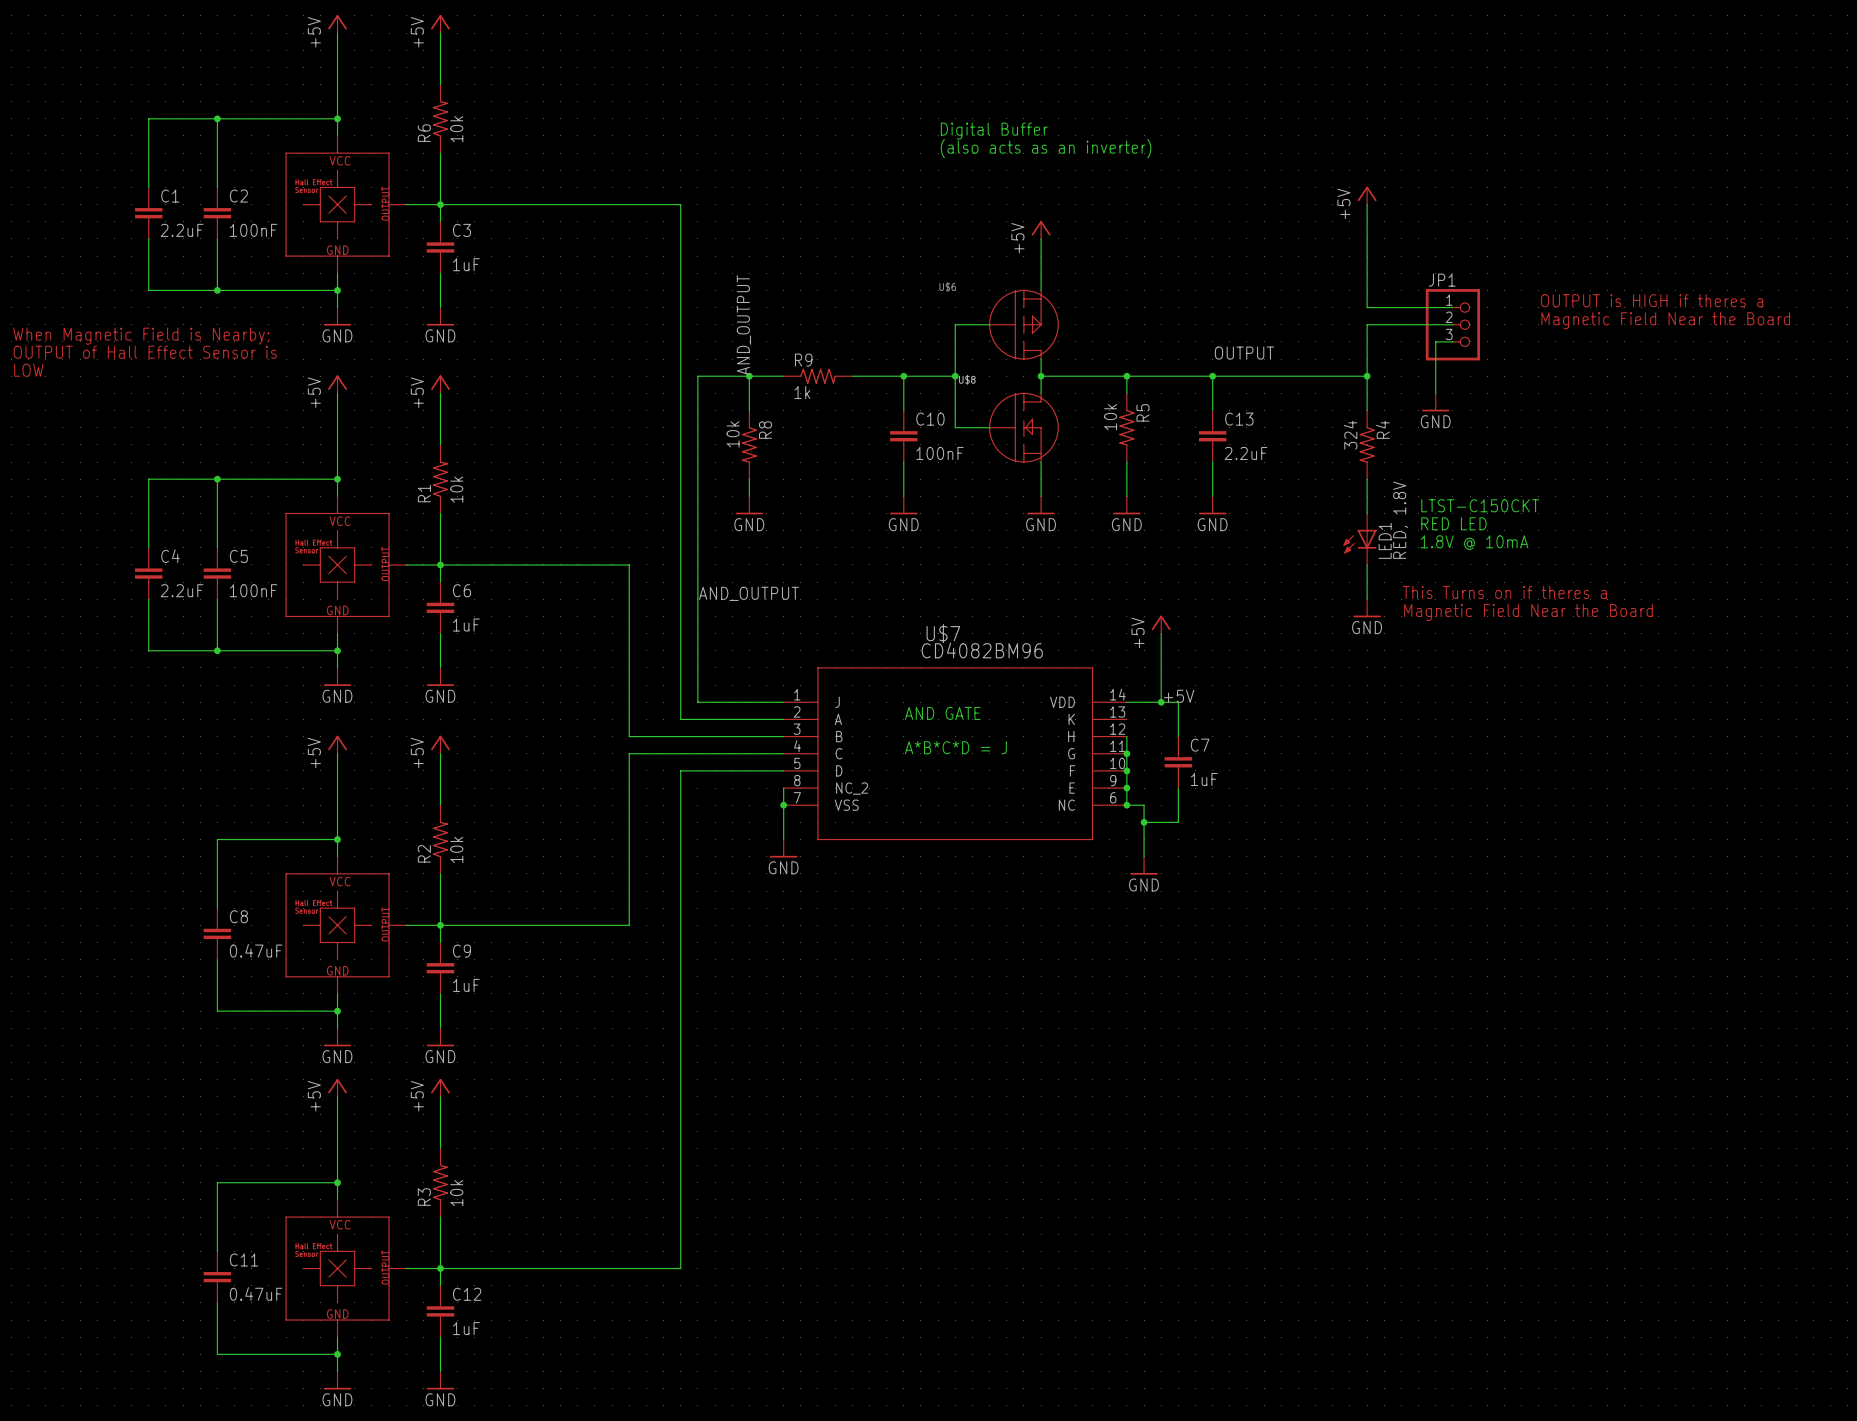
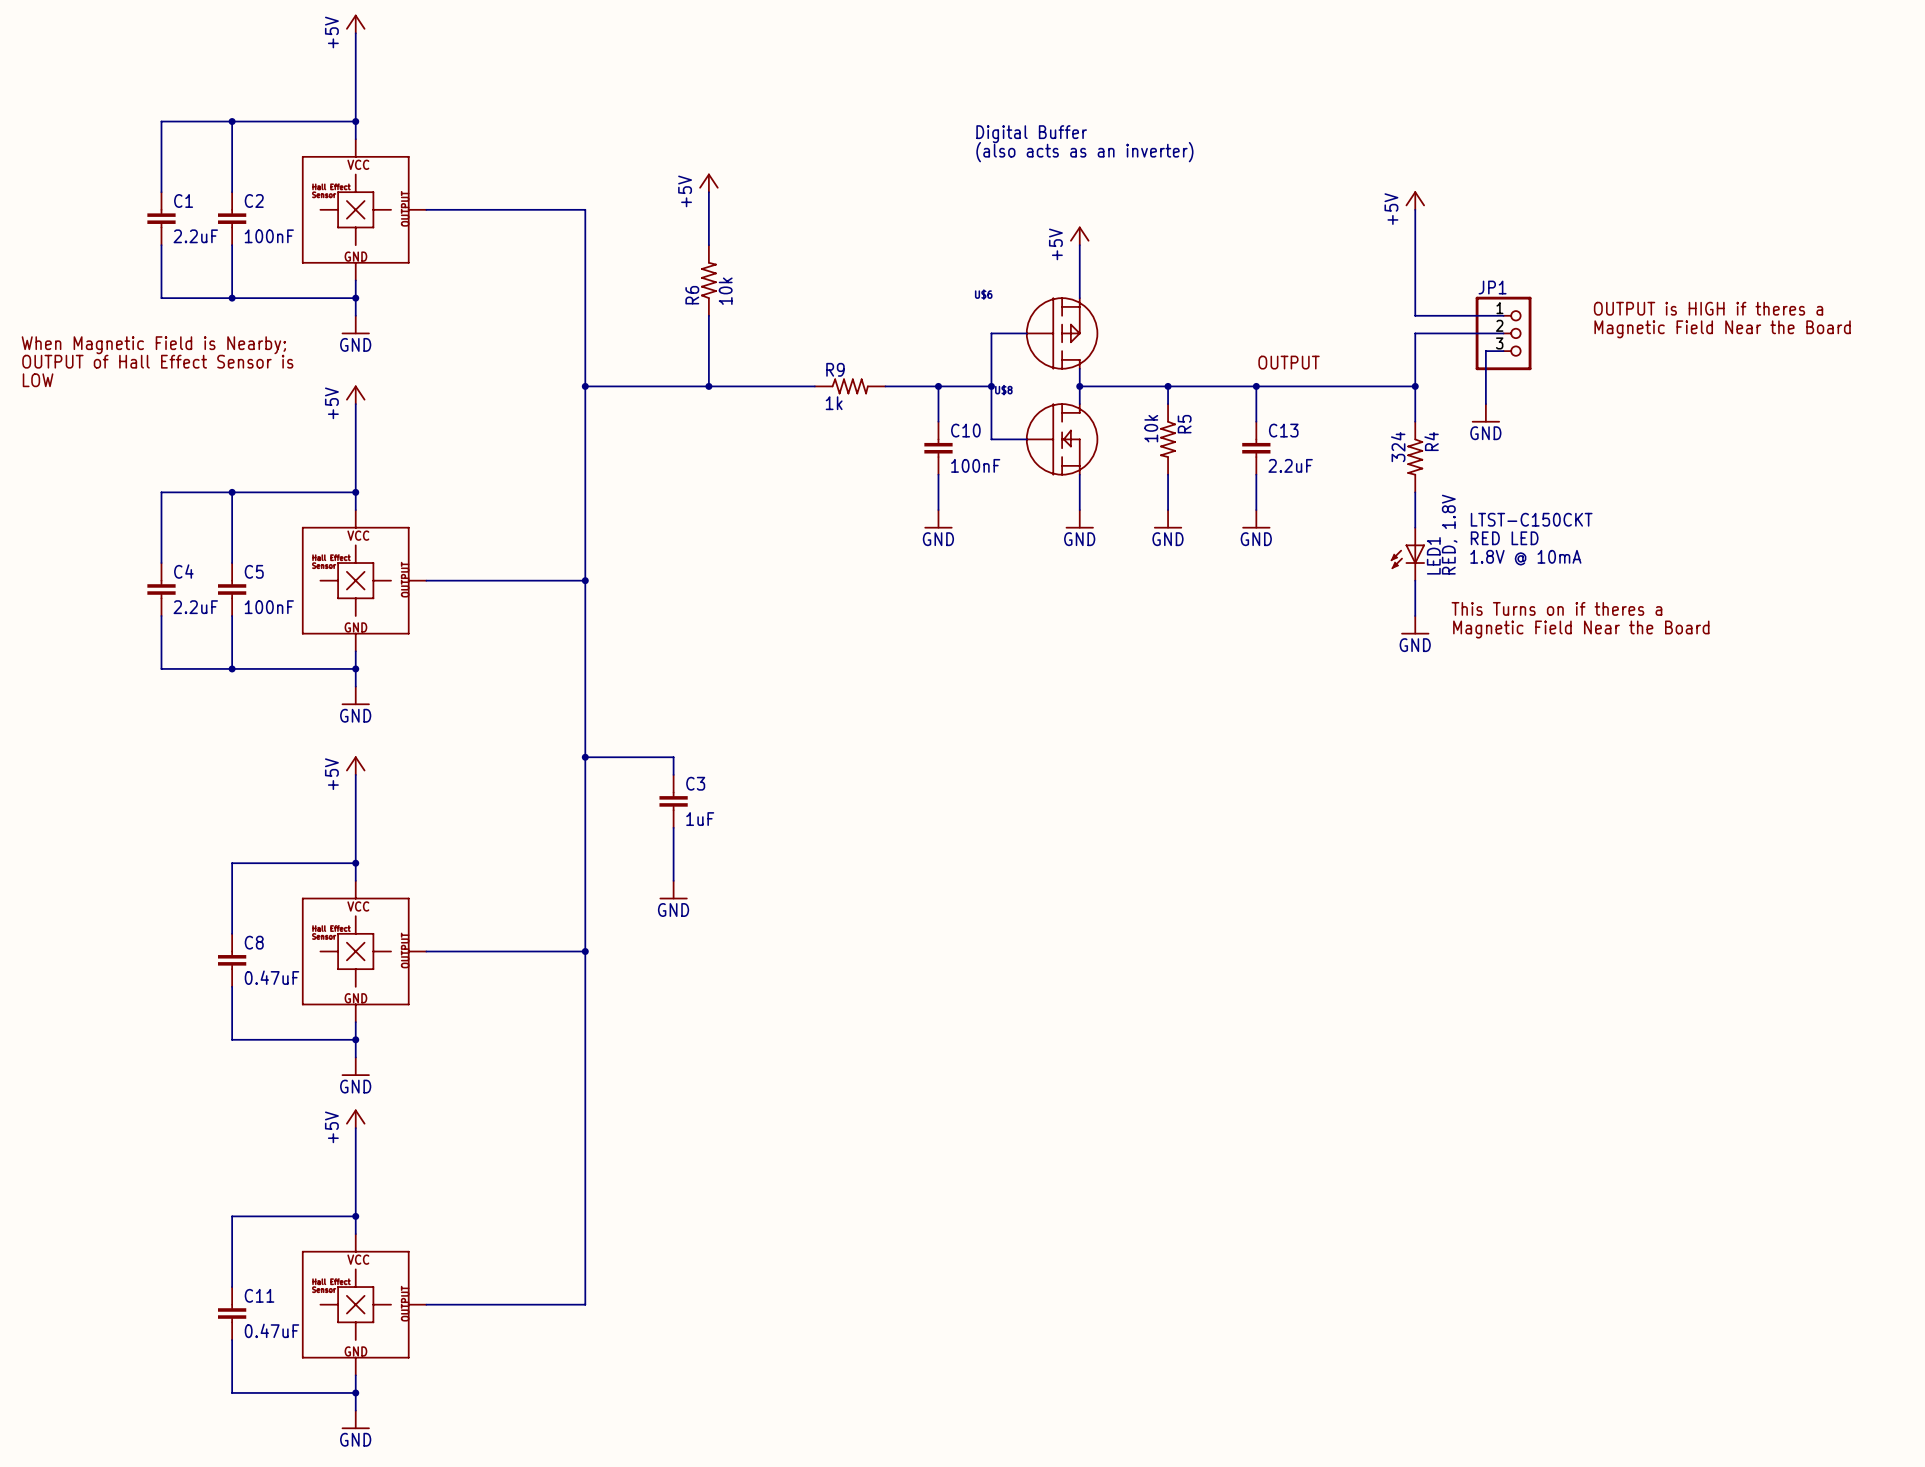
power symbol: +5V (440, 24) -> none
wire: (440, 33) (440, 84) -> none
R6 position: (440, 118) -> (708, 280)
wire: (440, 153) (440, 221) -> none
power symbol: none -> +5V (708, 182)
junction: (440, 204) -> none
wire: (560, 204) (680, 204) -> (708, 192) (708, 209)
C3 position: (440, 247) -> (673, 801)
wire: (440, 273) (440, 307) -> none
power symbol: GND (440, 316) -> none
label: AND_OUTPUT (743, 325) -> none
junction: none -> (585, 386)
wire: (680, 376) (680, 719) (783, 719) -> none
junction: none -> (708, 386)
wire: (697, 376) (697, 702) (783, 702) -> (726, 386) (585, 386)
wire: (749, 376) (749, 410) -> none
junction: (749, 376) -> none
power symbol: +5V (440, 384) -> none
wire: (440, 393) (440, 444) -> none
R8: 10k (749, 444) -> none
R1: 10k (440, 479) -> none
wire: (749, 479) (749, 496) -> none
power symbol: GND (749, 505) -> none
wire: (440, 513) (440, 582) -> none
junction: (440, 564) -> none
wire: (560, 564) (629, 564) (629, 736) -> (585, 757) (655, 757)
junction: none -> (585, 580)
label: AND_OUTPUT (748, 593) -> none
C6: 1uF (440, 607) -> none
power symbol: +5V (1161, 624) -> none
wire: (440, 633) (440, 667) -> none
wire: (1161, 633) (1161, 702) -> none
power symbol: GND (440, 676) -> none
label: +5V (1179, 696) -> none
wire: (1126, 702) (1178, 702) (1178, 736) -> none
junction: (1161, 702) -> none
text: AND GATE (942, 713) -> none
junction: none -> (585, 757)
wire: (646, 736) (783, 736) -> (673, 757) (673, 774)
wire: (1126, 736) (1126, 805) (1144, 805) (1144, 856) -> none
power symbol: +5V (440, 744) -> none
text: A*B*C*D = J (955, 747) -> none
wire: (440, 753) (440, 805) -> none
wire: (783, 753) (629, 753) (629, 925) (560, 925) -> none
U$7: CD4082BM96 (955, 753) -> none
junction: (1126, 753) -> none
C7: 1uF (1178, 762) -> none
wire: (783, 770) (680, 770) (680, 1268) (560, 1268) -> (585, 209) (585, 1304)
junction: (1126, 770) -> none
wire: (783, 788) (783, 839) -> (673, 827) (673, 880)
junction: (1126, 788) -> none
wire: (1178, 788) (1178, 822) (1144, 822) -> none
junction: (783, 805) -> none
junction: (1126, 805) -> none
junction: (1144, 822) -> none
R2: 10k (440, 839) -> none
power symbol: GND (783, 848) -> none
power symbol: none -> GND (673, 890)
power symbol: GND (1144, 865) -> none
wire: (440, 873) (440, 942) -> none
junction: (440, 925) -> none
junction: none -> (585, 951)
C9: 1uF (440, 968) -> none
wire: (440, 993) (440, 1028) -> none
power symbol: GND (440, 1037) -> none
power symbol: +5V (440, 1087) -> none
wire: (440, 1096) (440, 1148) -> none
R3: 10k (440, 1182) -> none
wire: (440, 1217) (440, 1285) -> none
junction: (440, 1268) -> none
C12: 1uF (440, 1311) -> none
wire: (440, 1337) (440, 1371) -> none
power symbol: GND (440, 1380) -> none

